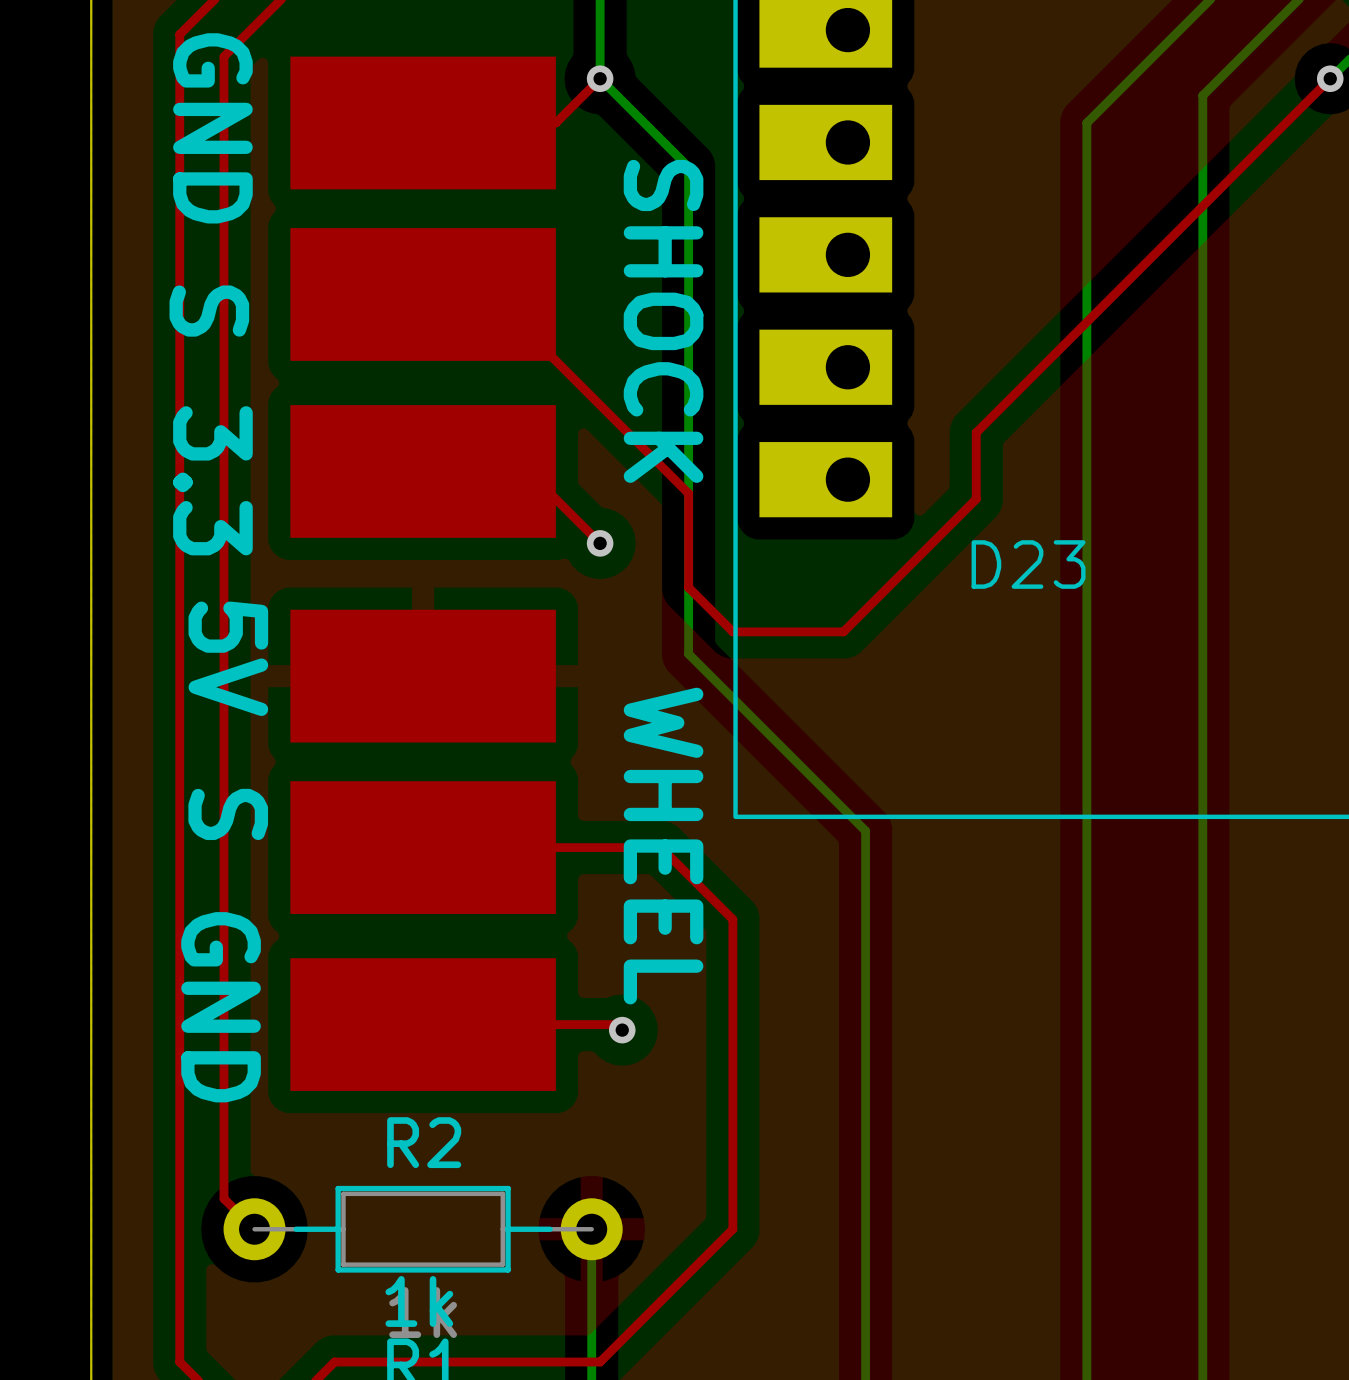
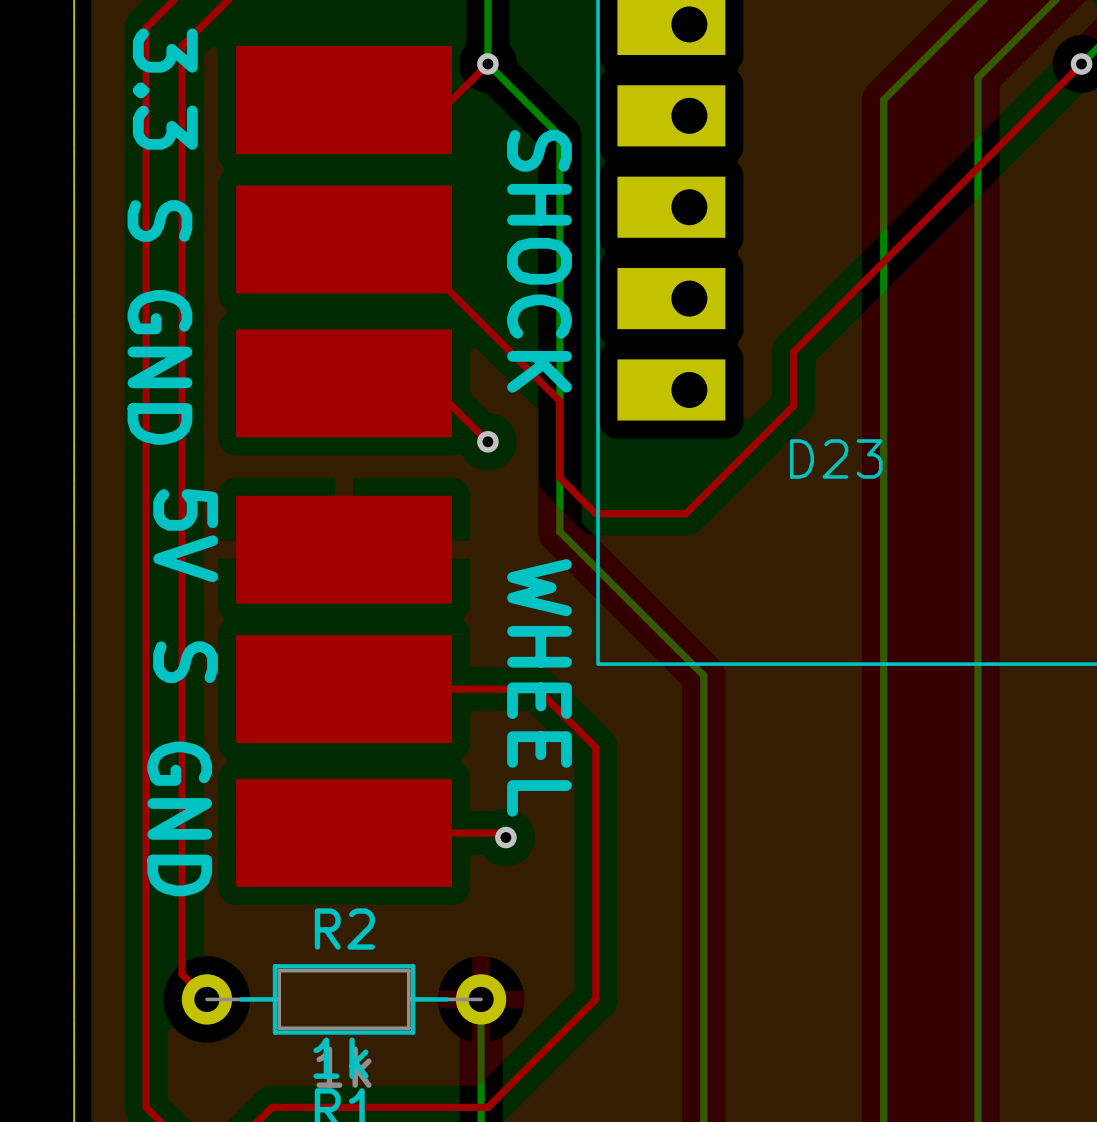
text: GND (212, 128) -> 3.3 (165, 89)
text position: S (209, 311) -> S (159, 220)
text: none -> GND (159, 367)
text: 3.3 (212, 480) -> none

